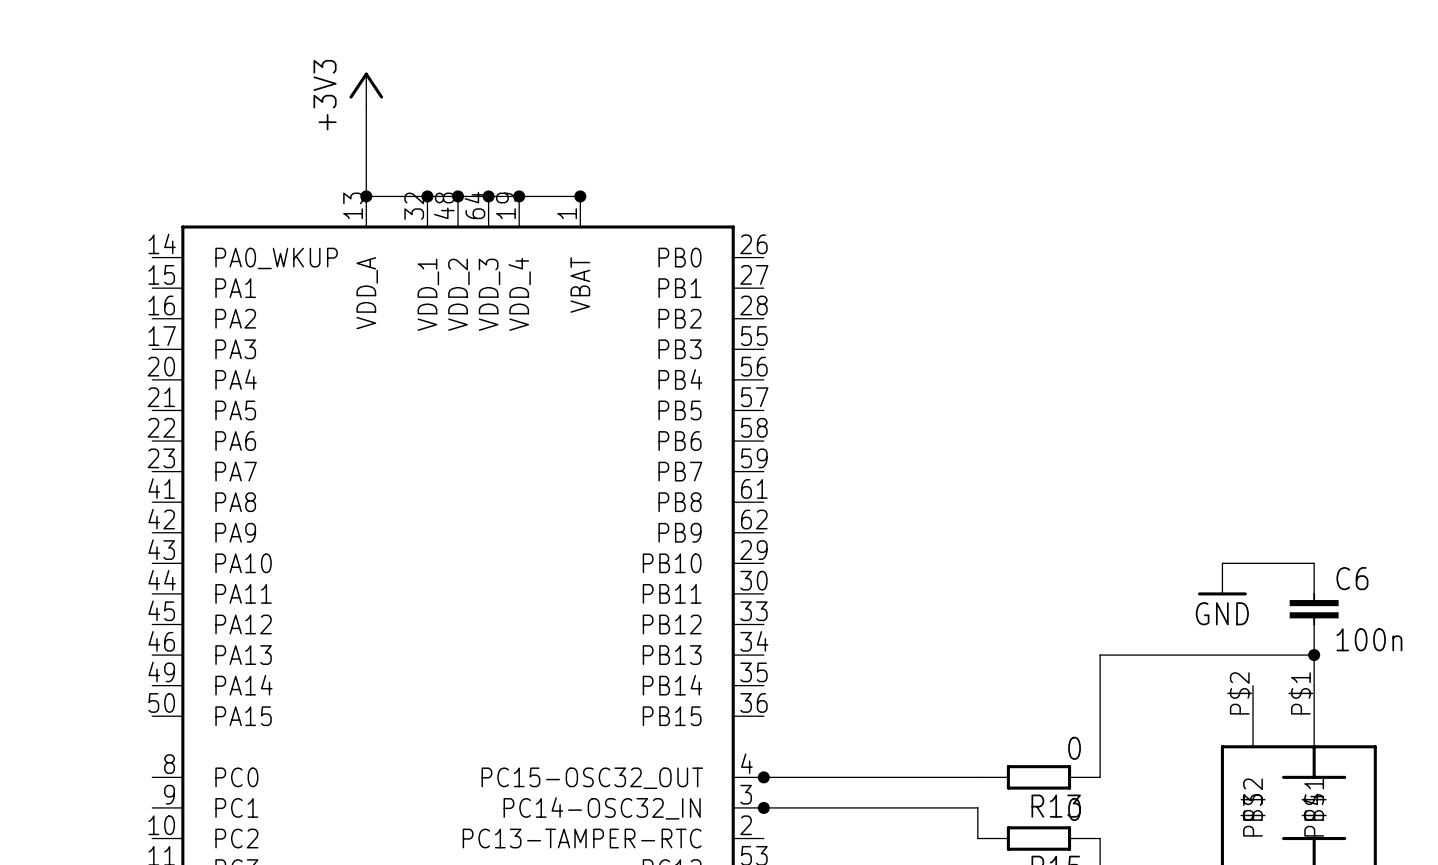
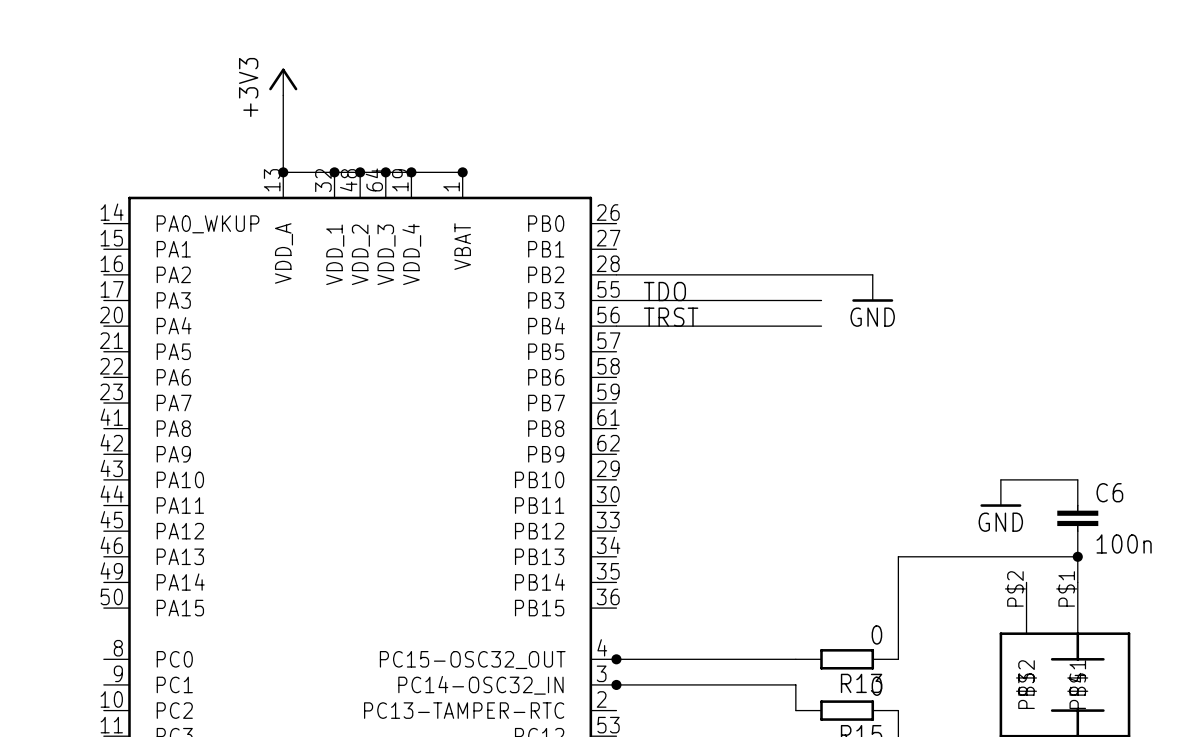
wire: none -> (616, 274) (872, 274)
power symbol: none -> GND (872, 288)
label: none -> TDO (664, 291)
wire: none -> (616, 300) (821, 300)
label: none -> TRST (671, 317)
wire: none -> (616, 326) (821, 326)

